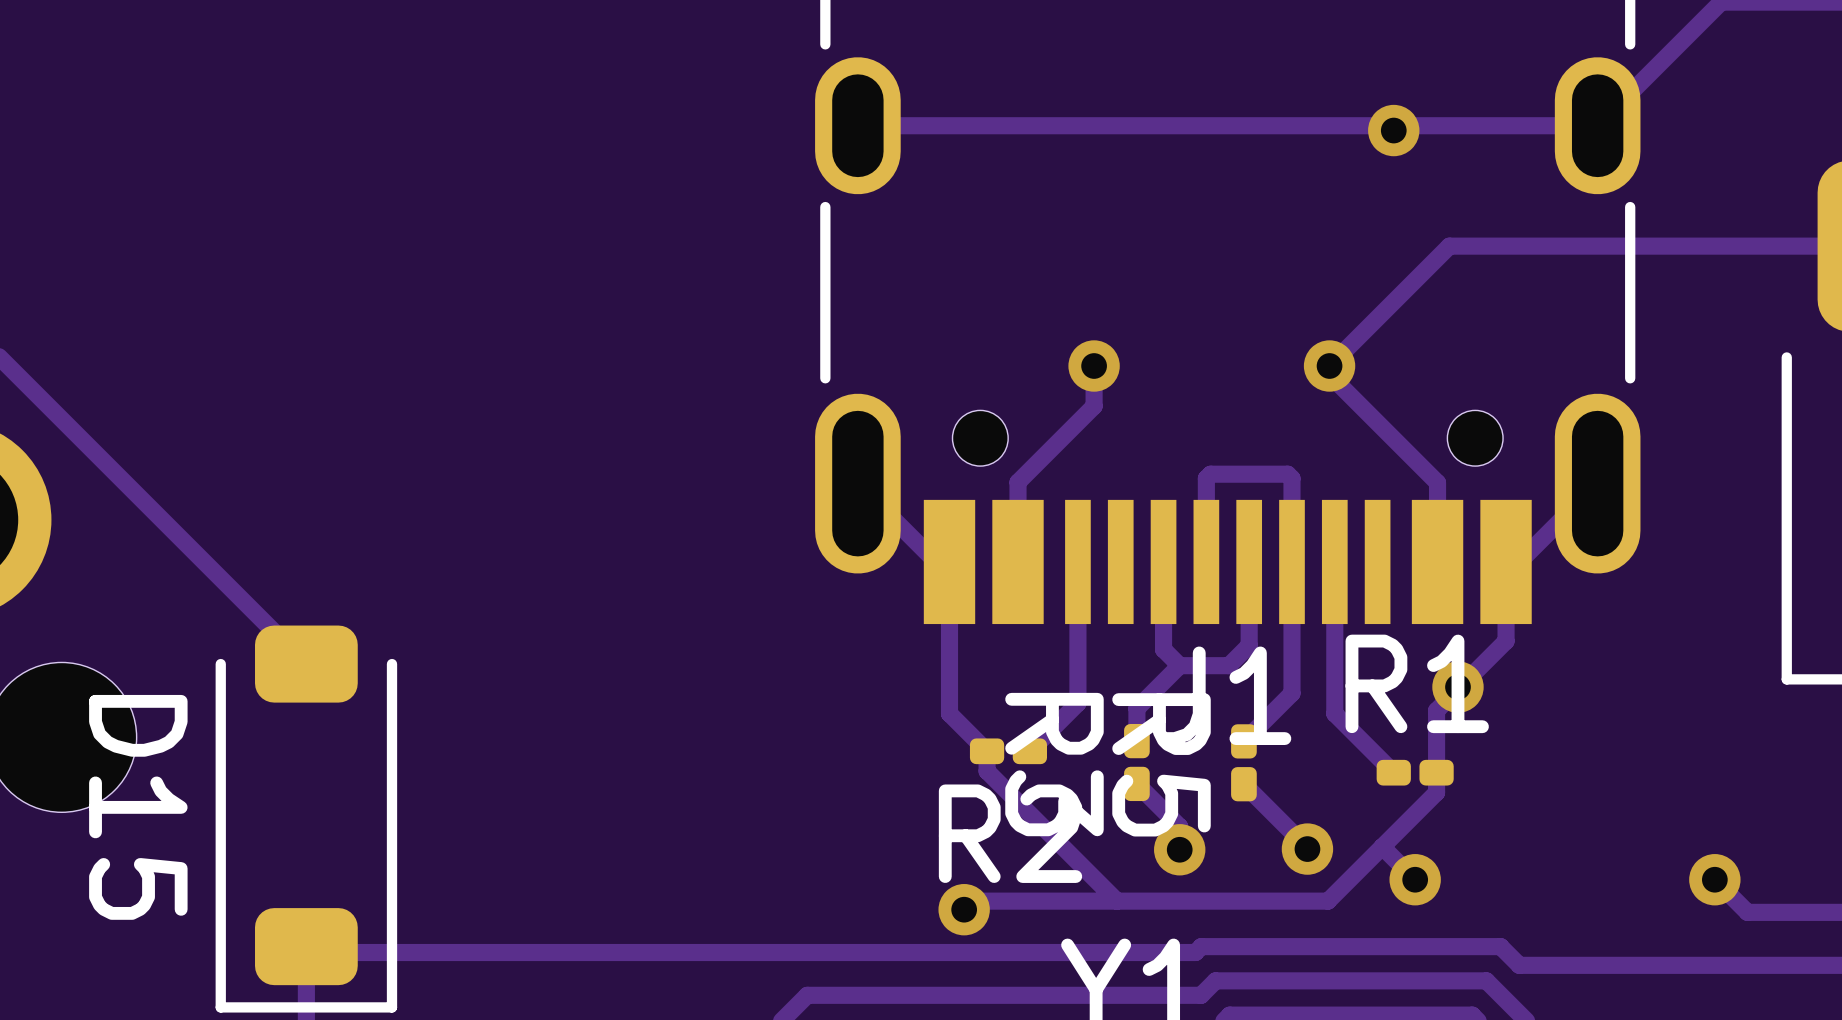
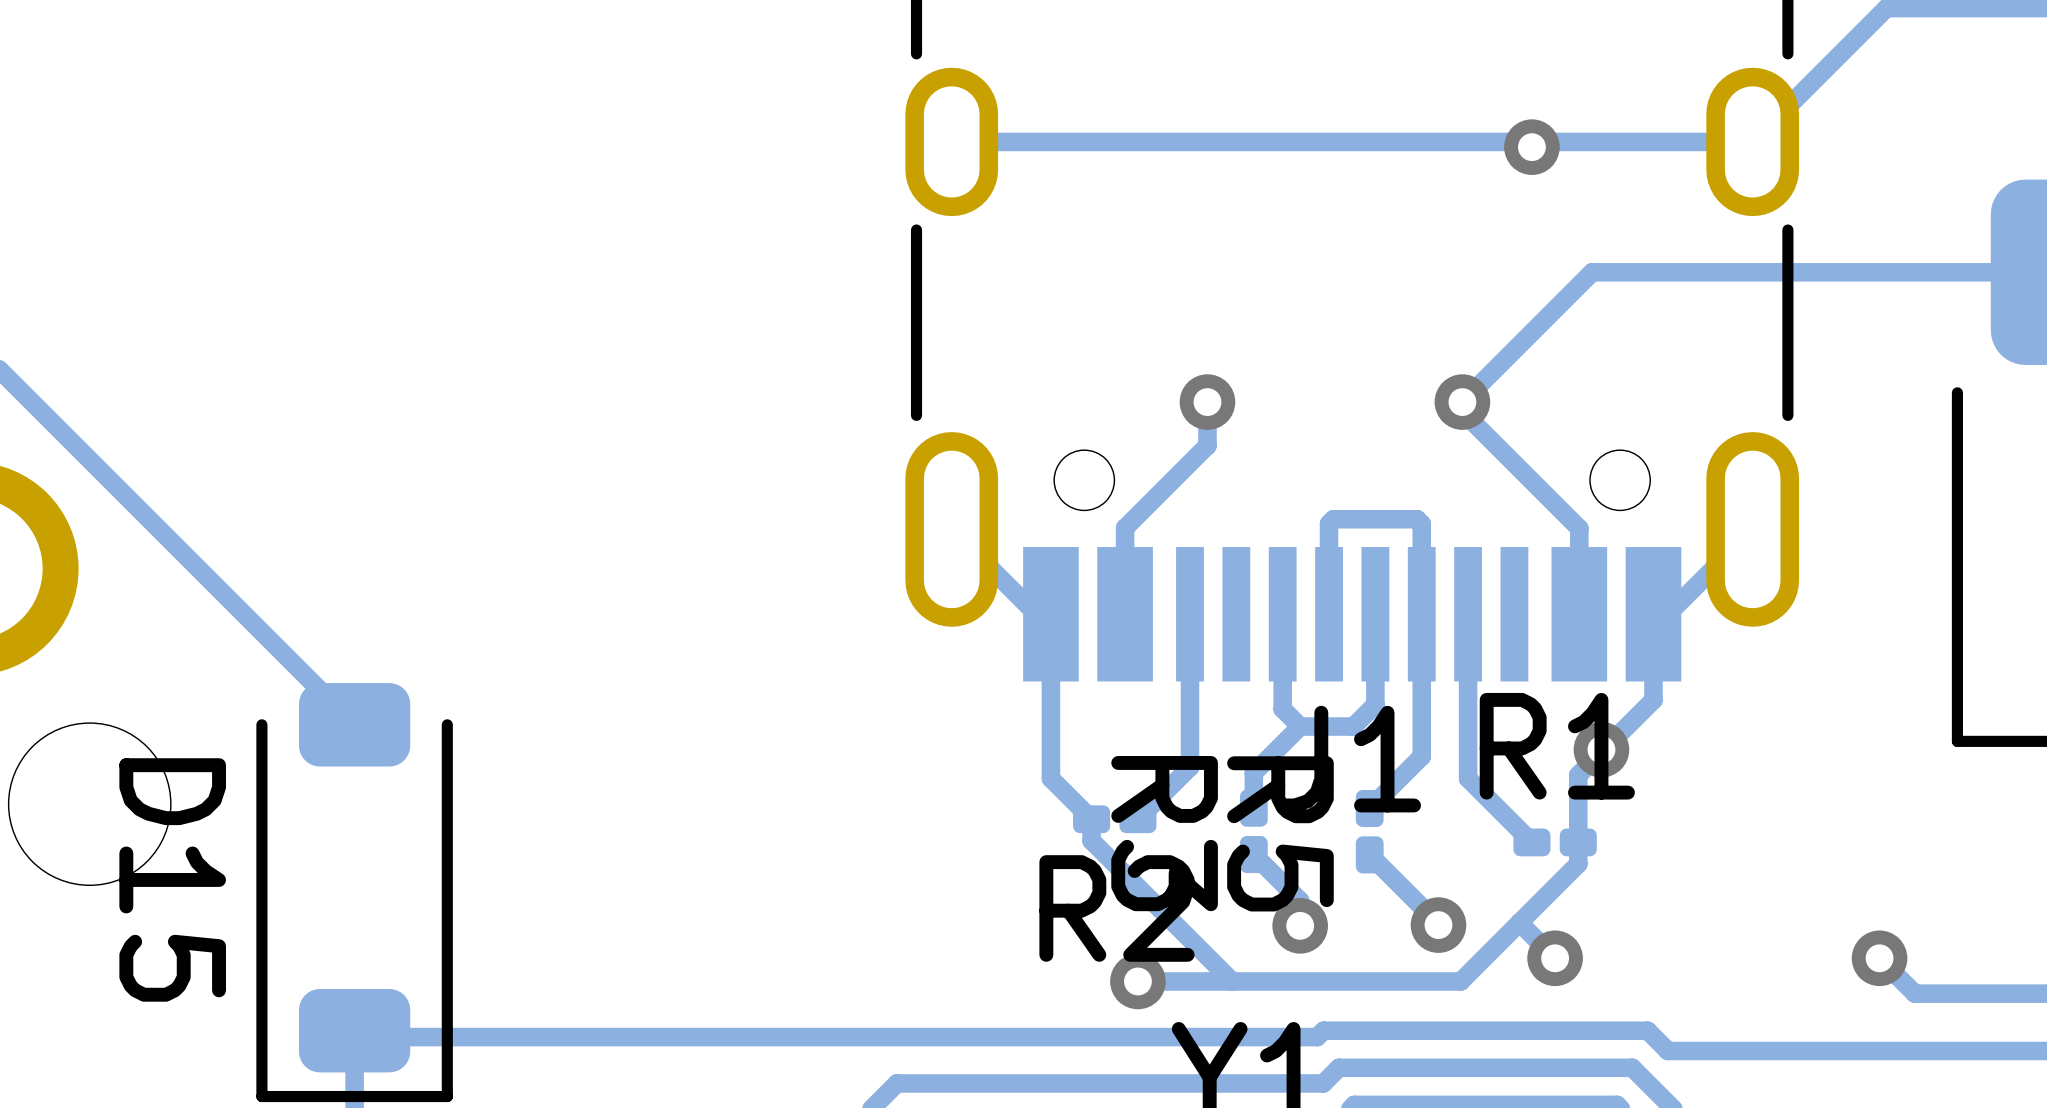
track: (1029, 901) (972, 901) (964, 909) -> none
via position: (964, 909) -> (1137, 981)

